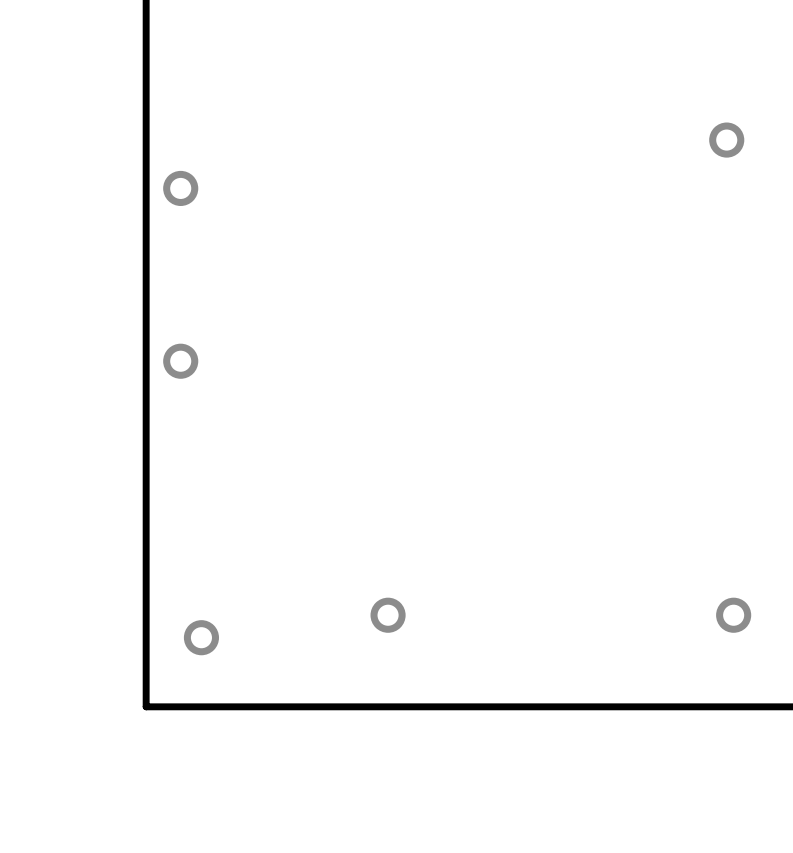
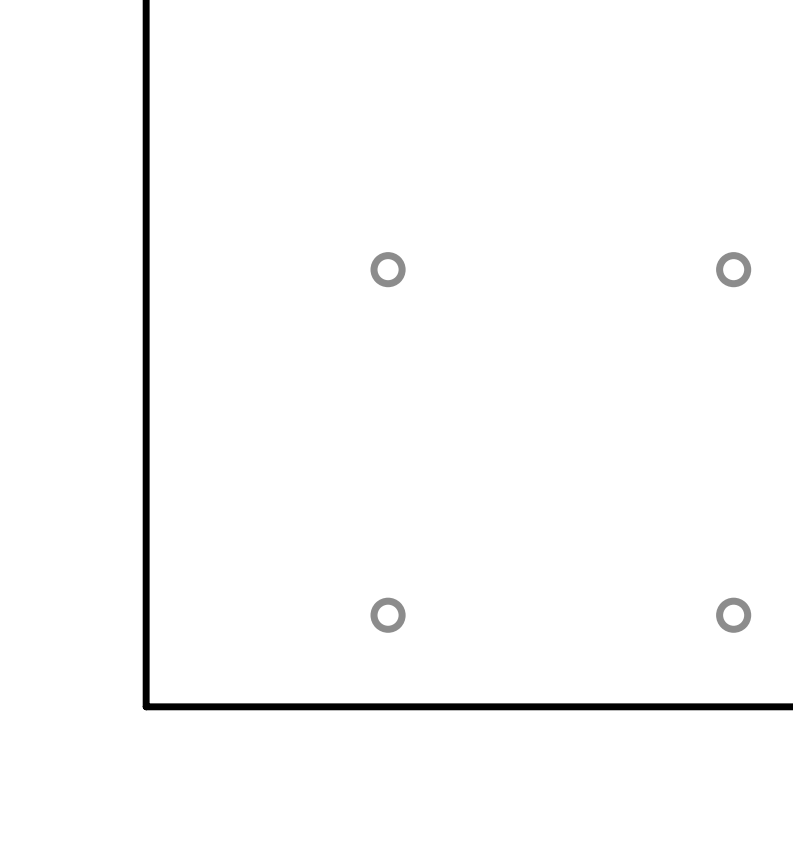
via: (726, 140) -> none
via: (180, 188) -> none
via: none -> (388, 269)
via: none -> (733, 269)
via: (180, 361) -> none
via: (201, 637) -> none

